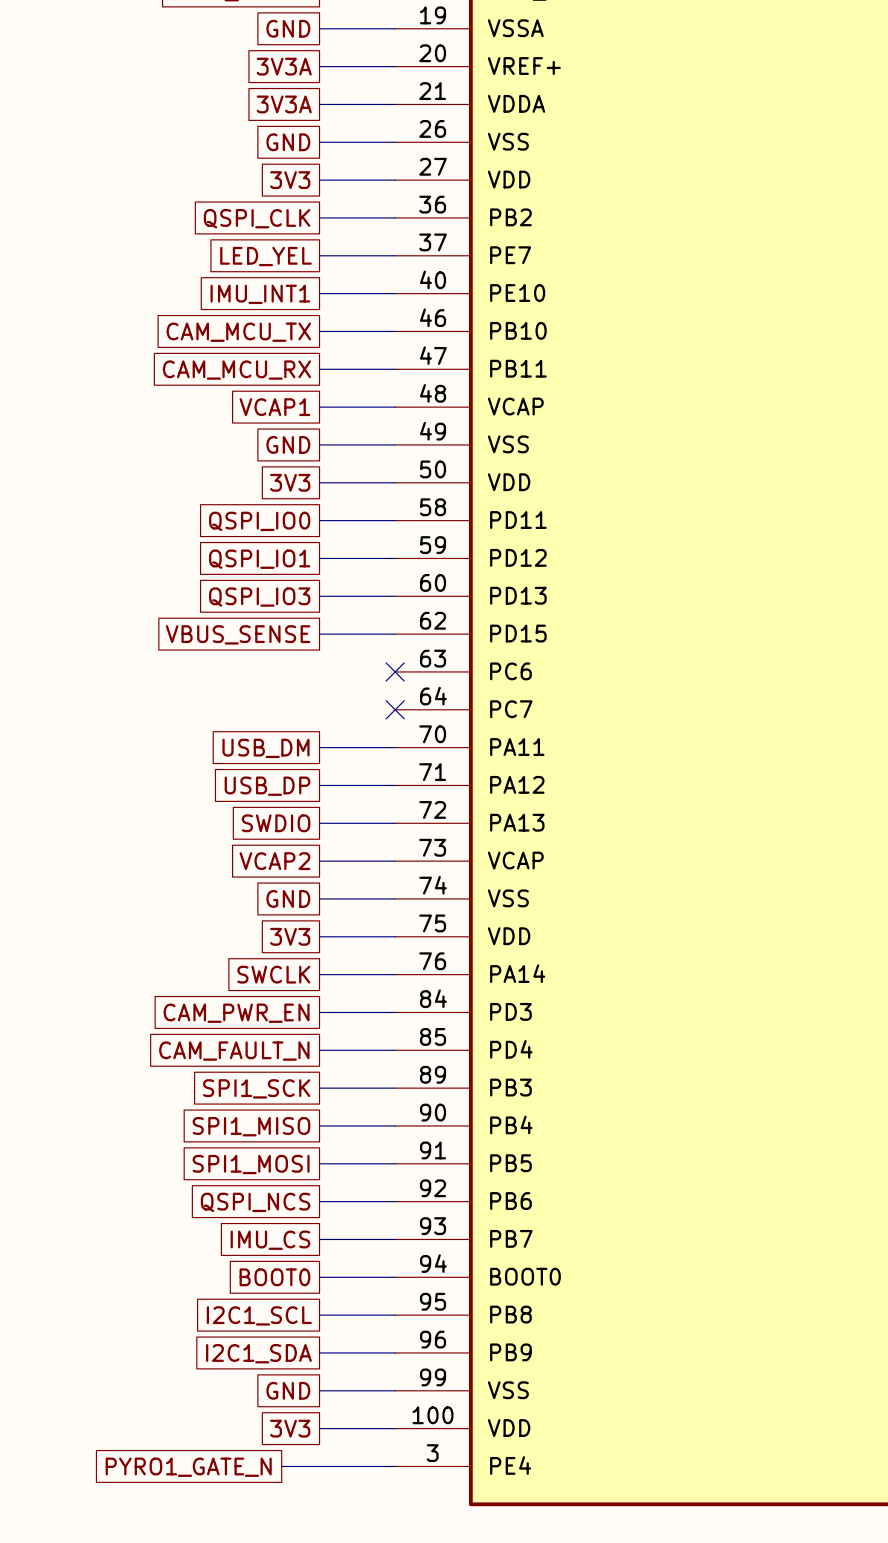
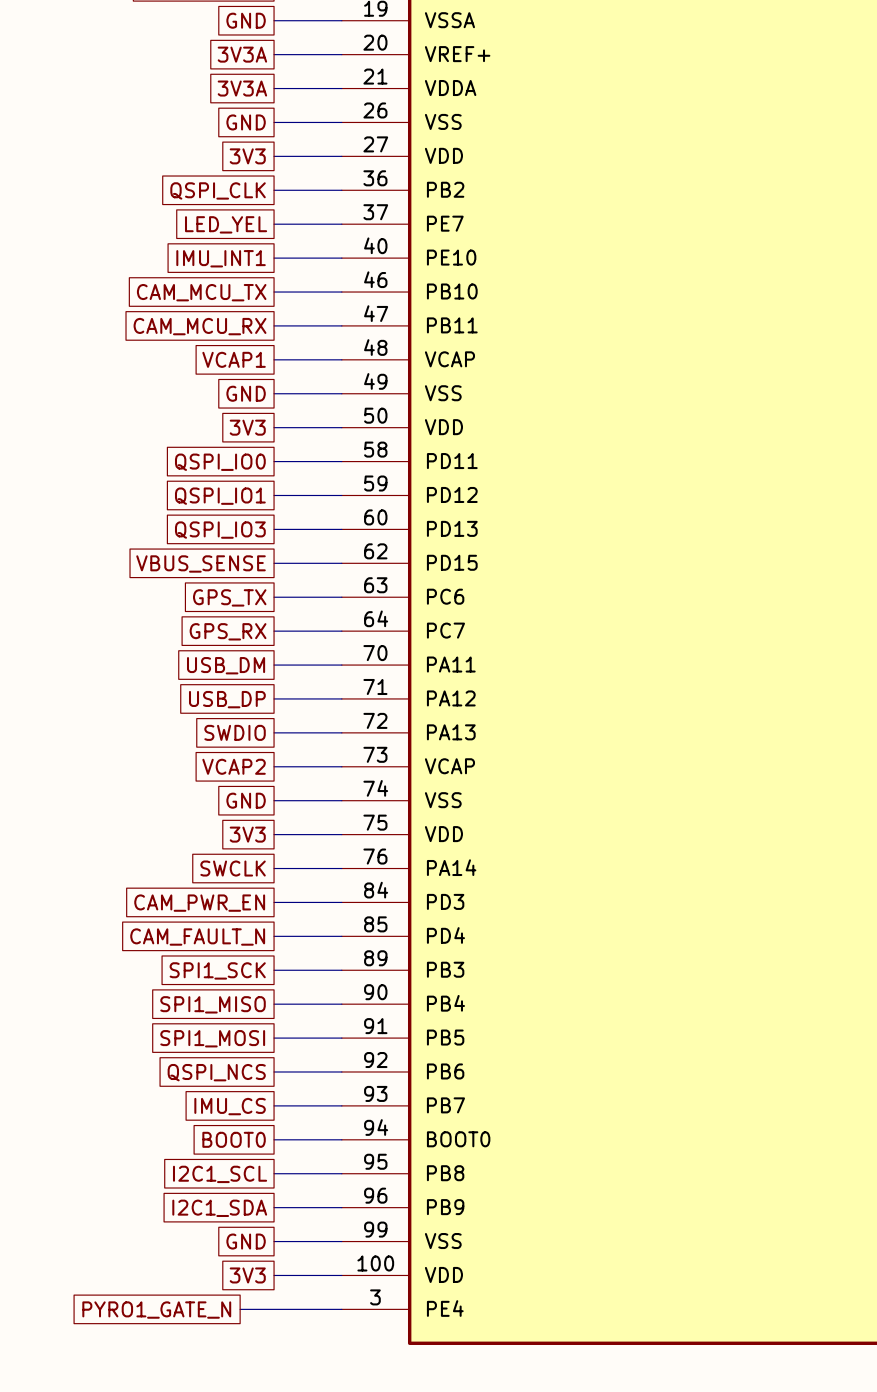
wire: none -> (274, 597) (341, 597)
no-connect mark: (395, 671) -> none
global label: none -> GPS_TX (229, 597)
wire: none -> (274, 631) (341, 631)
no-connect mark: (395, 709) -> none
global label: none -> GPS_RX (228, 631)

